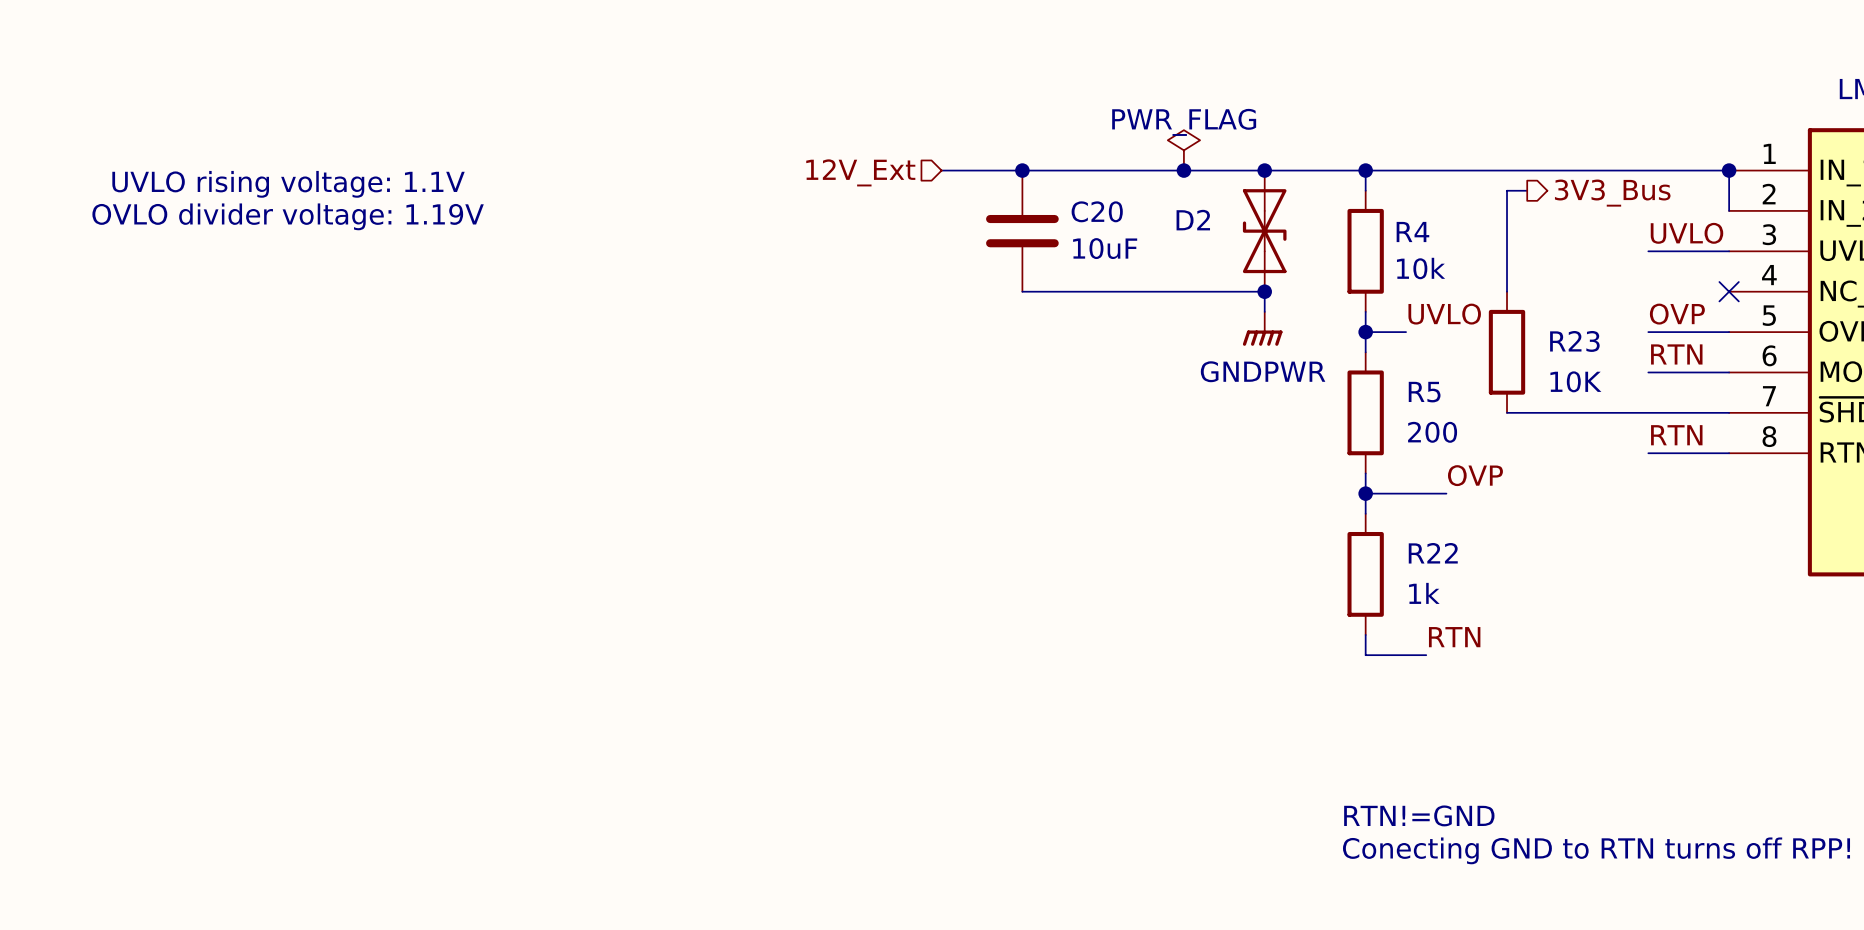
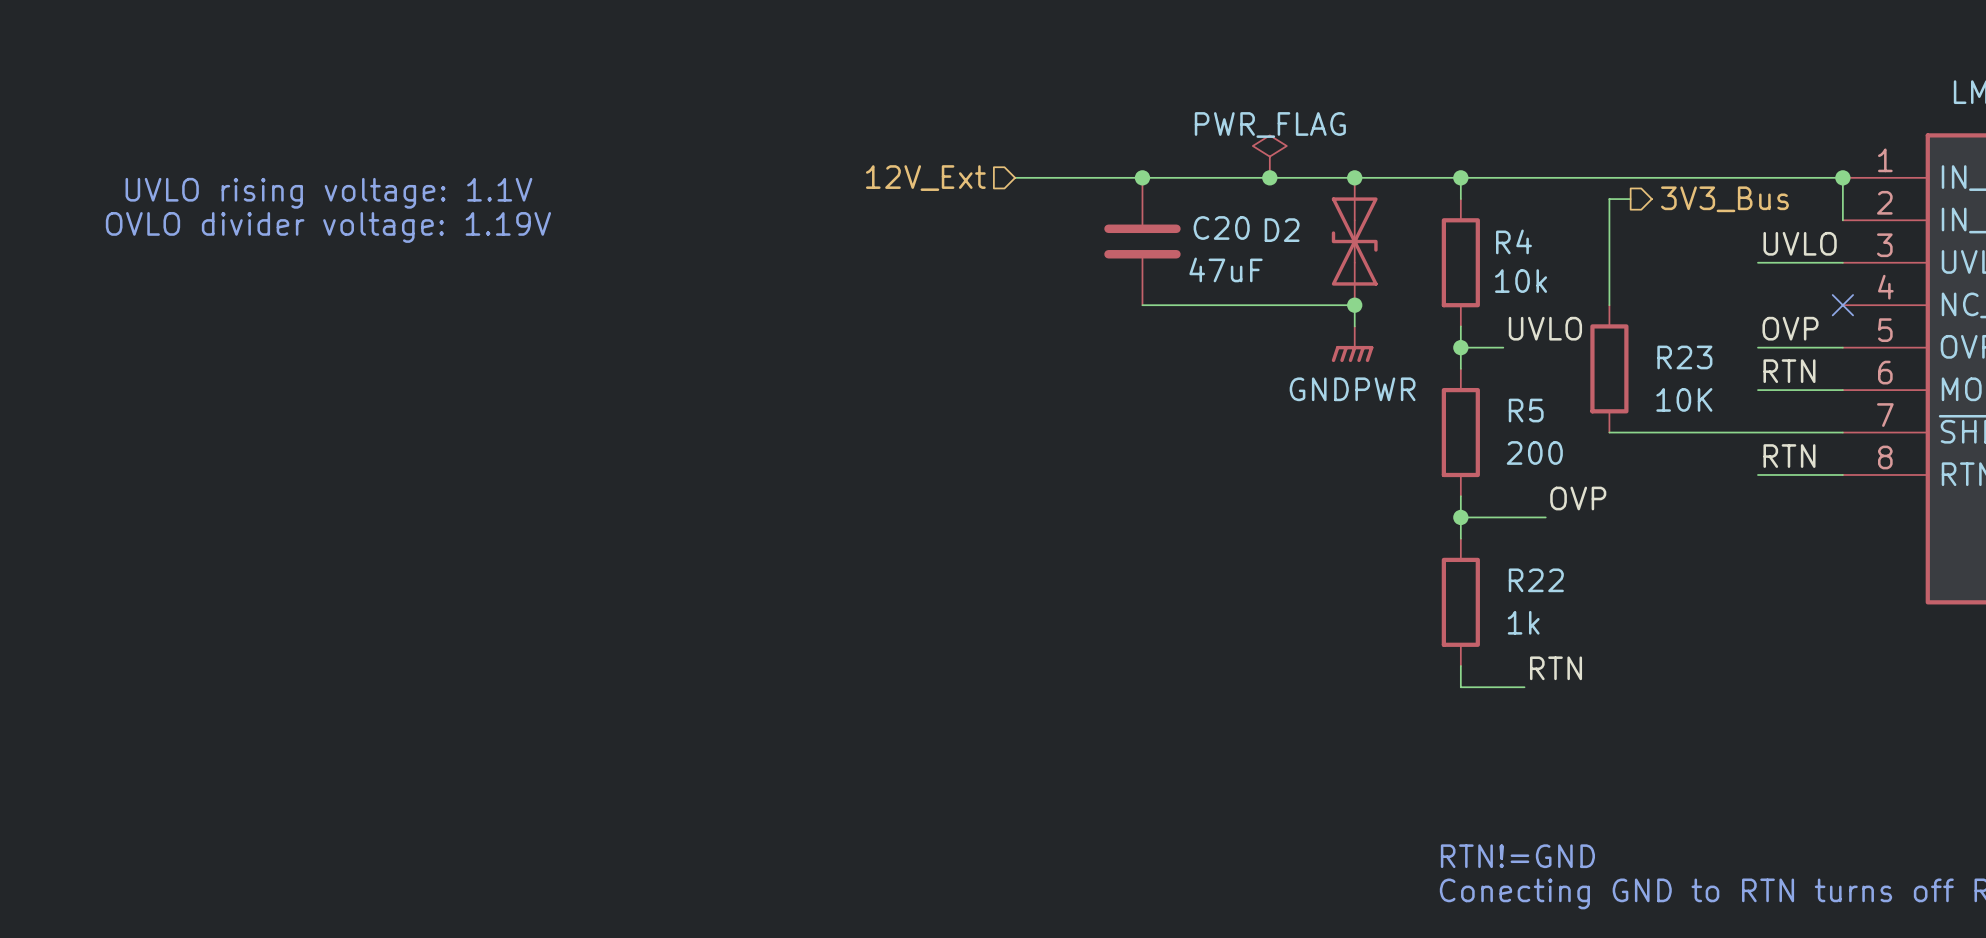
junction position: (1022, 170) -> (1142, 177)
C20 name position: C20 (1097, 211) -> C20 (1221, 227)
C20 position: (1022, 231) -> (1142, 241)
C20 value: 10uF (1105, 248) -> 47uF (1226, 269)
wire: (1022, 291) (1062, 291) -> none

